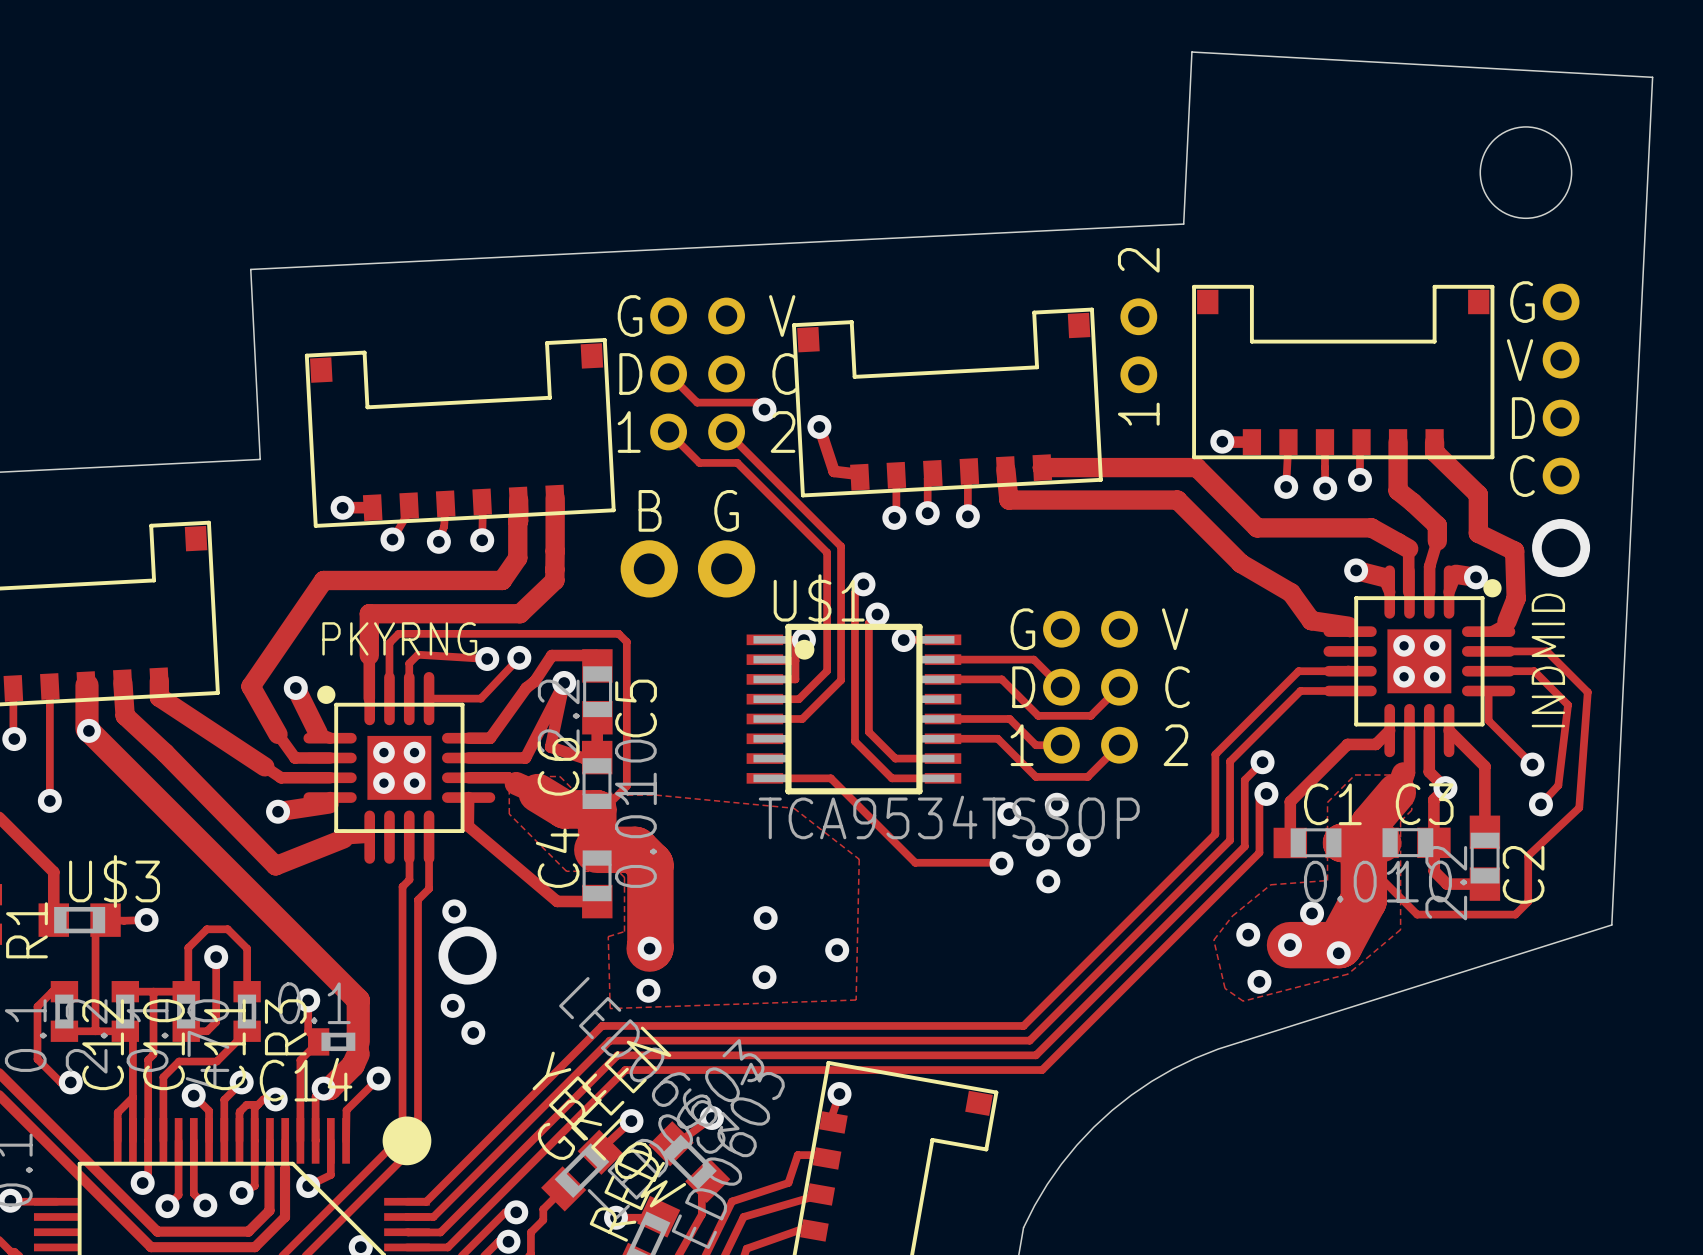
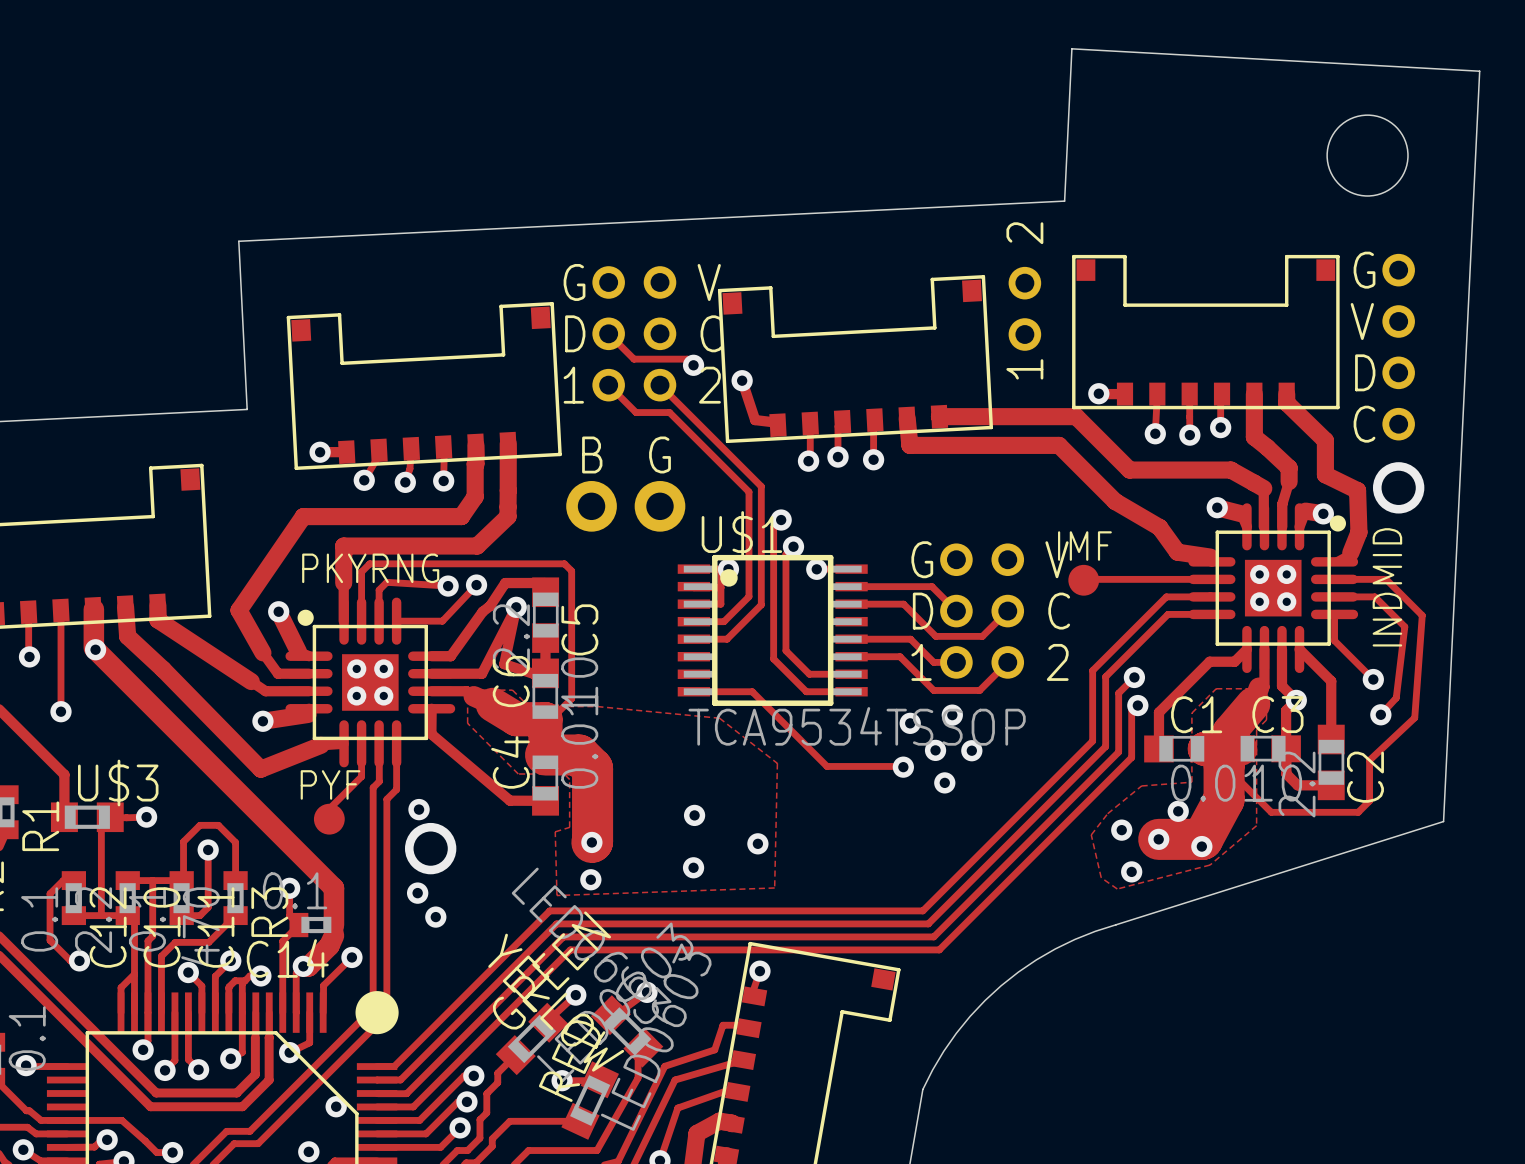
track: none -> (1211, 579) (1083, 580)
IMF: none -> (1083, 580)
track: none -> (361, 743) (361, 776) (329, 808) (329, 819)
PYF: none -> (329, 819)

